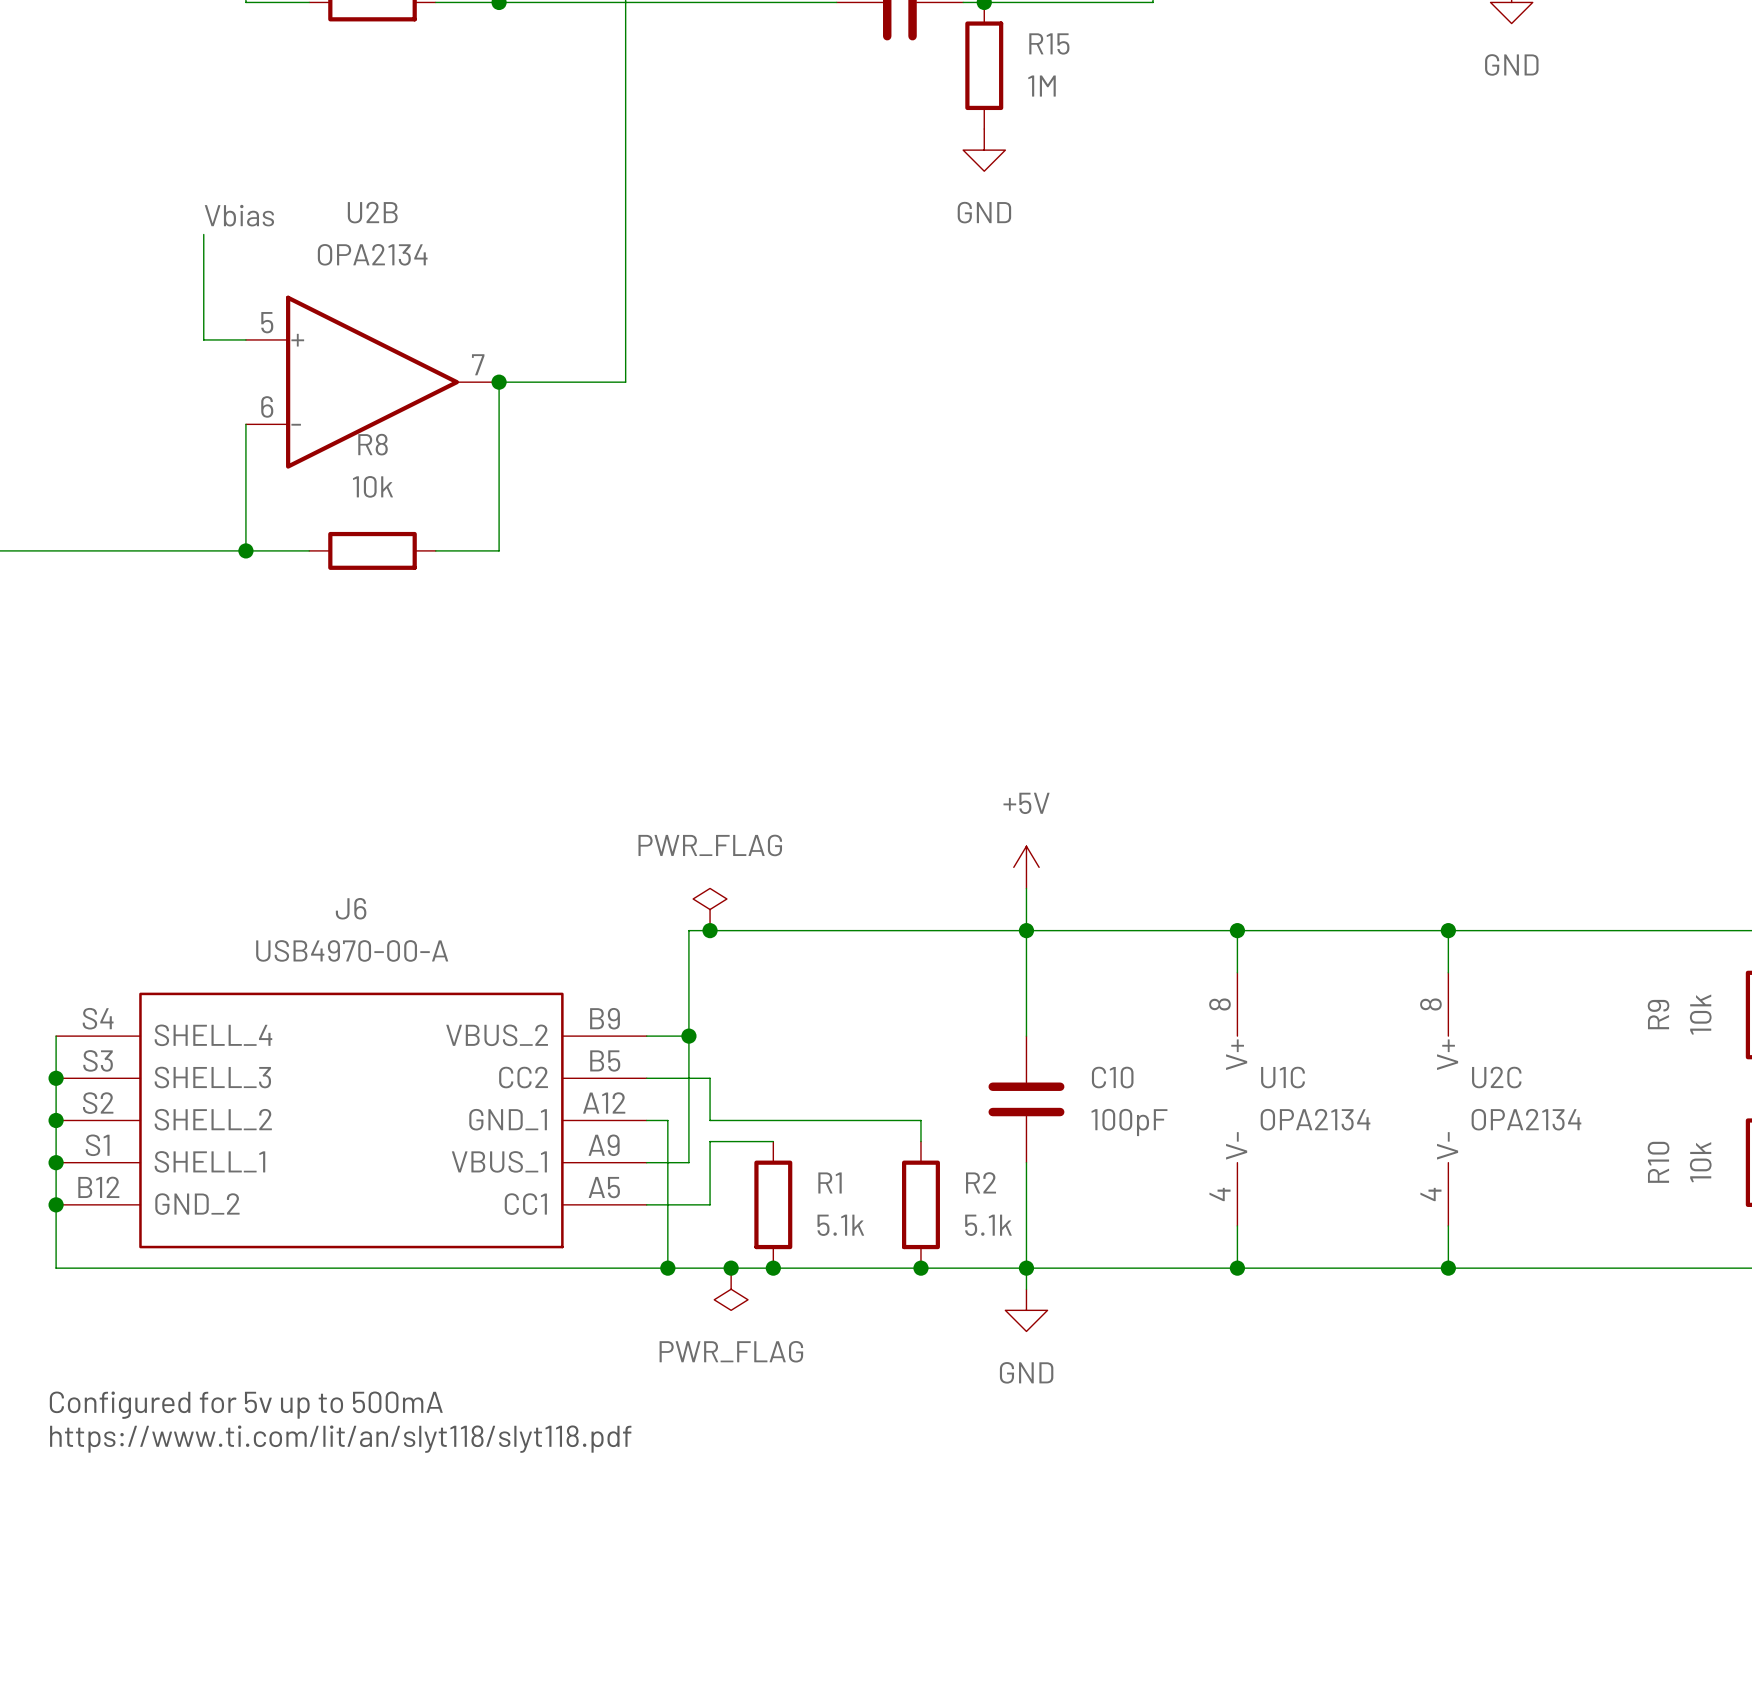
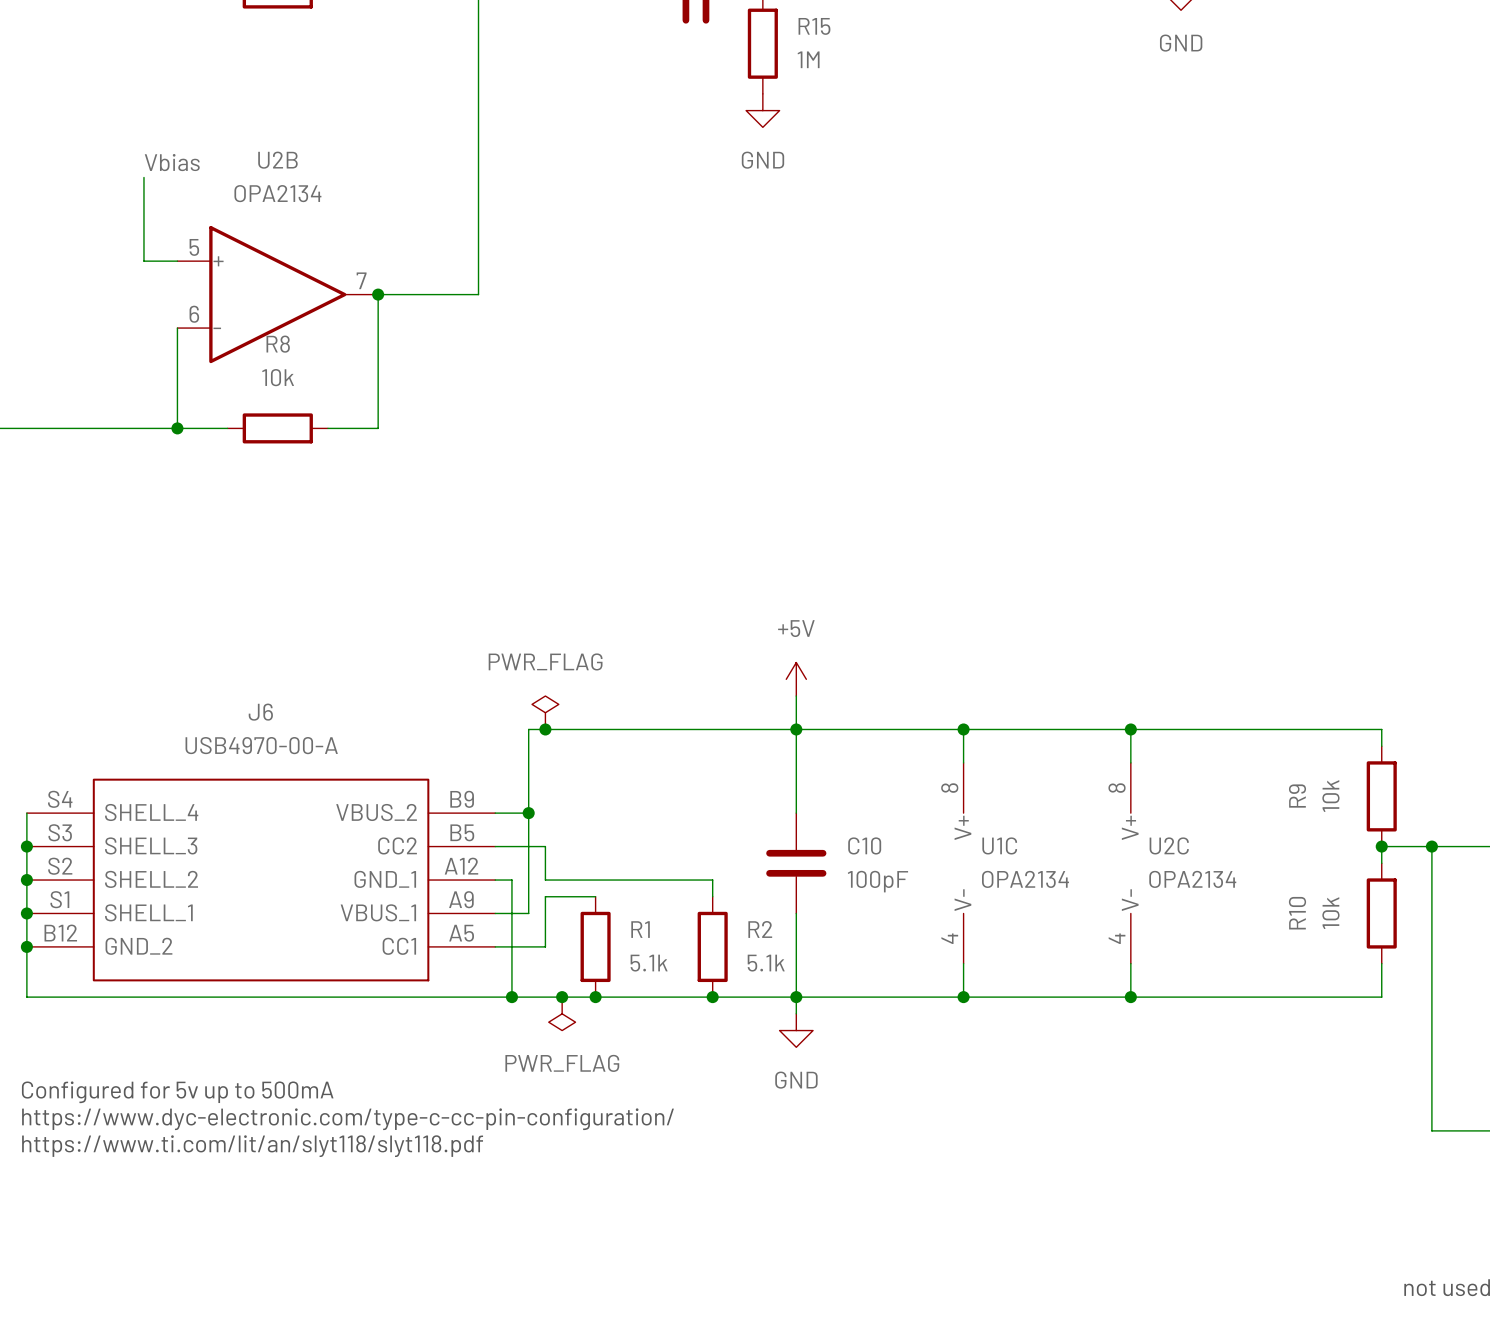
text position: Configured for 5v up to 500mA (246, 1405) -> Configured for 5v up to 500mA (177, 1092)
text: none -> https://www.dyc-electronic.com/type-c-cc-pin-configuration/ (348, 1119)
text position: https://www.ti.com/lit/an/slyt118/slyt118.pdf (340, 1439) -> https://www.ti.com/lit/an/slyt118/slyt118.pdf (252, 1146)

